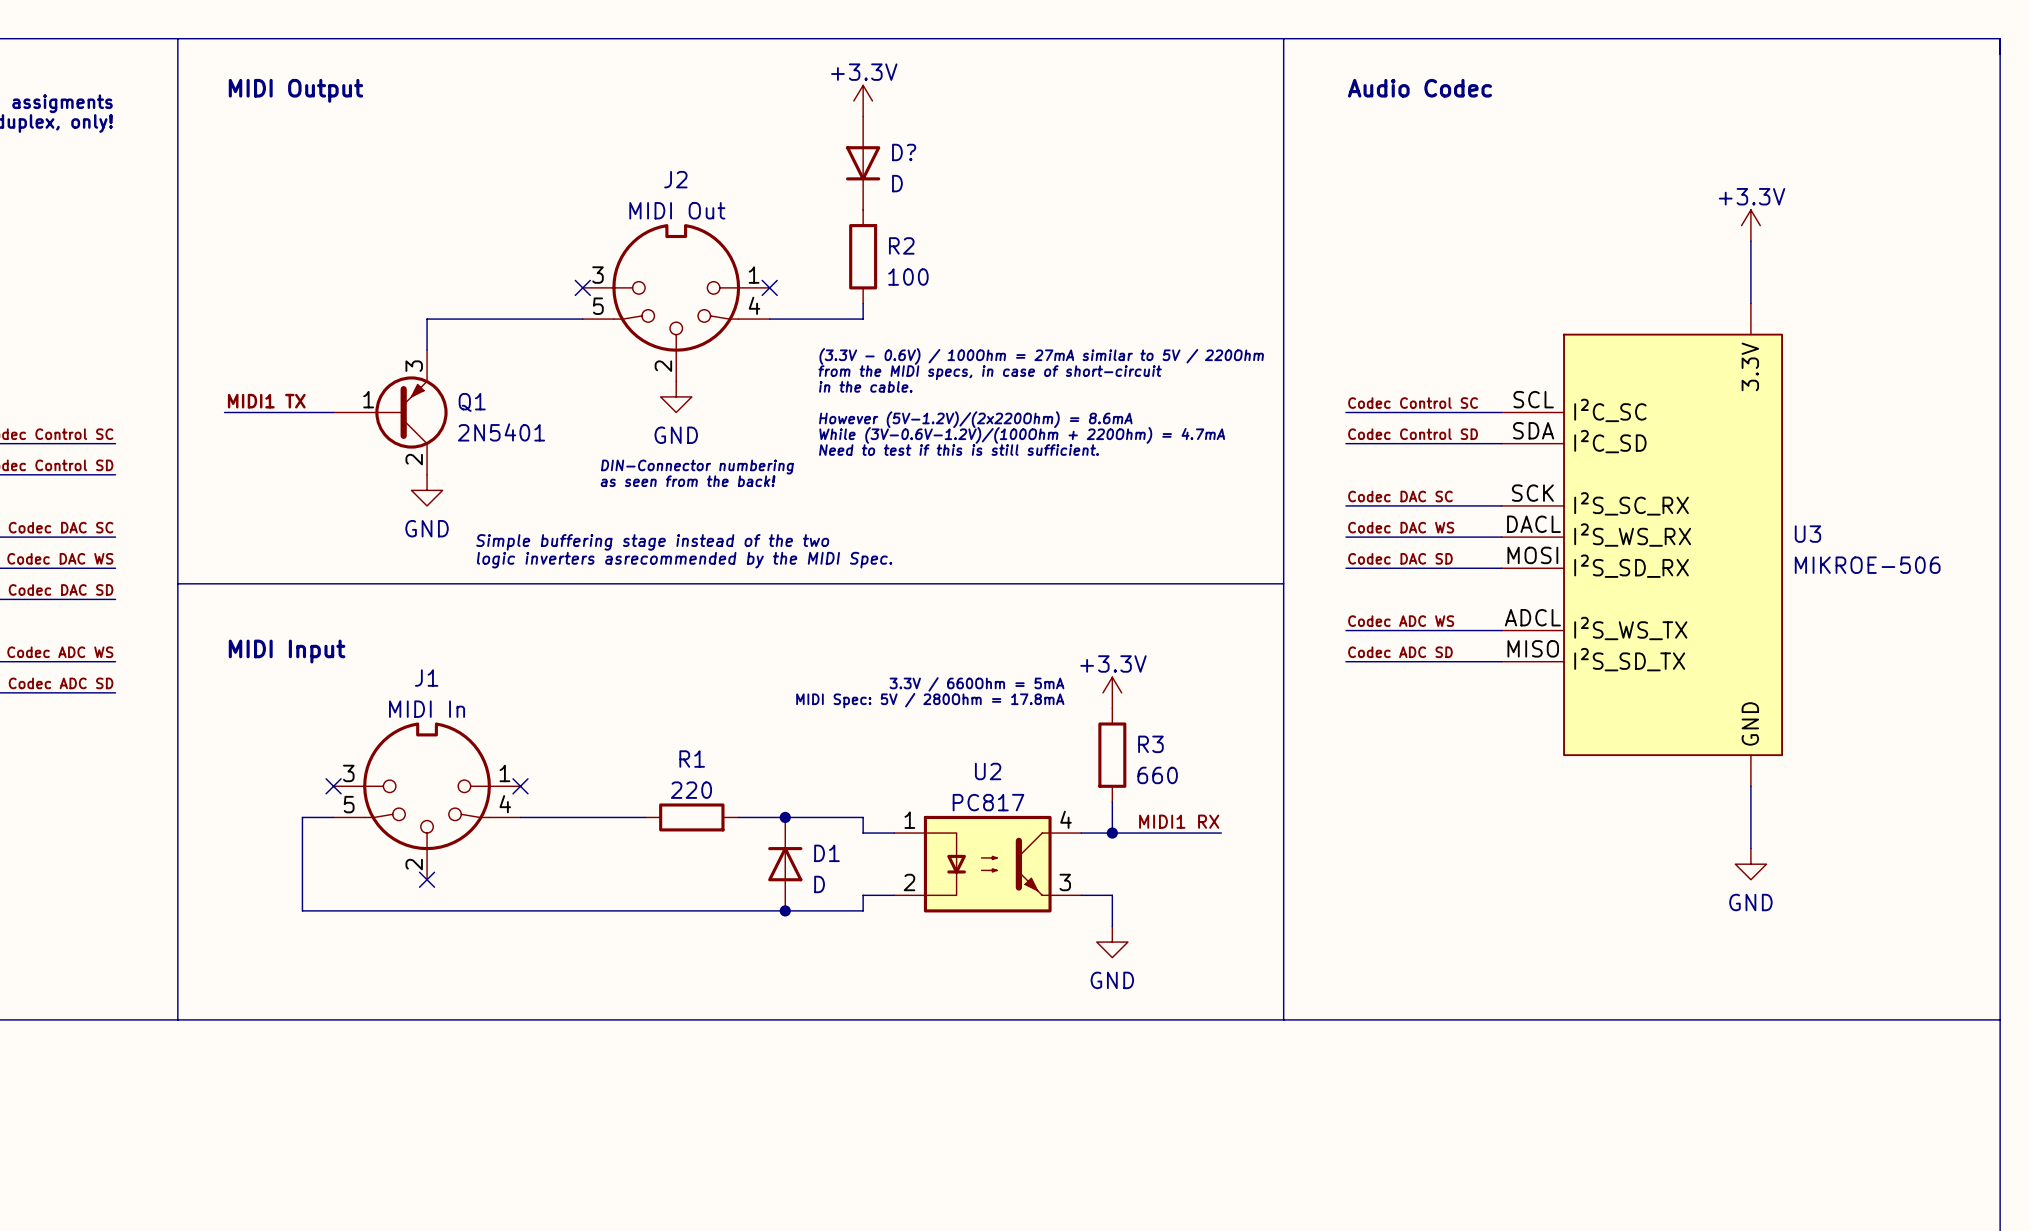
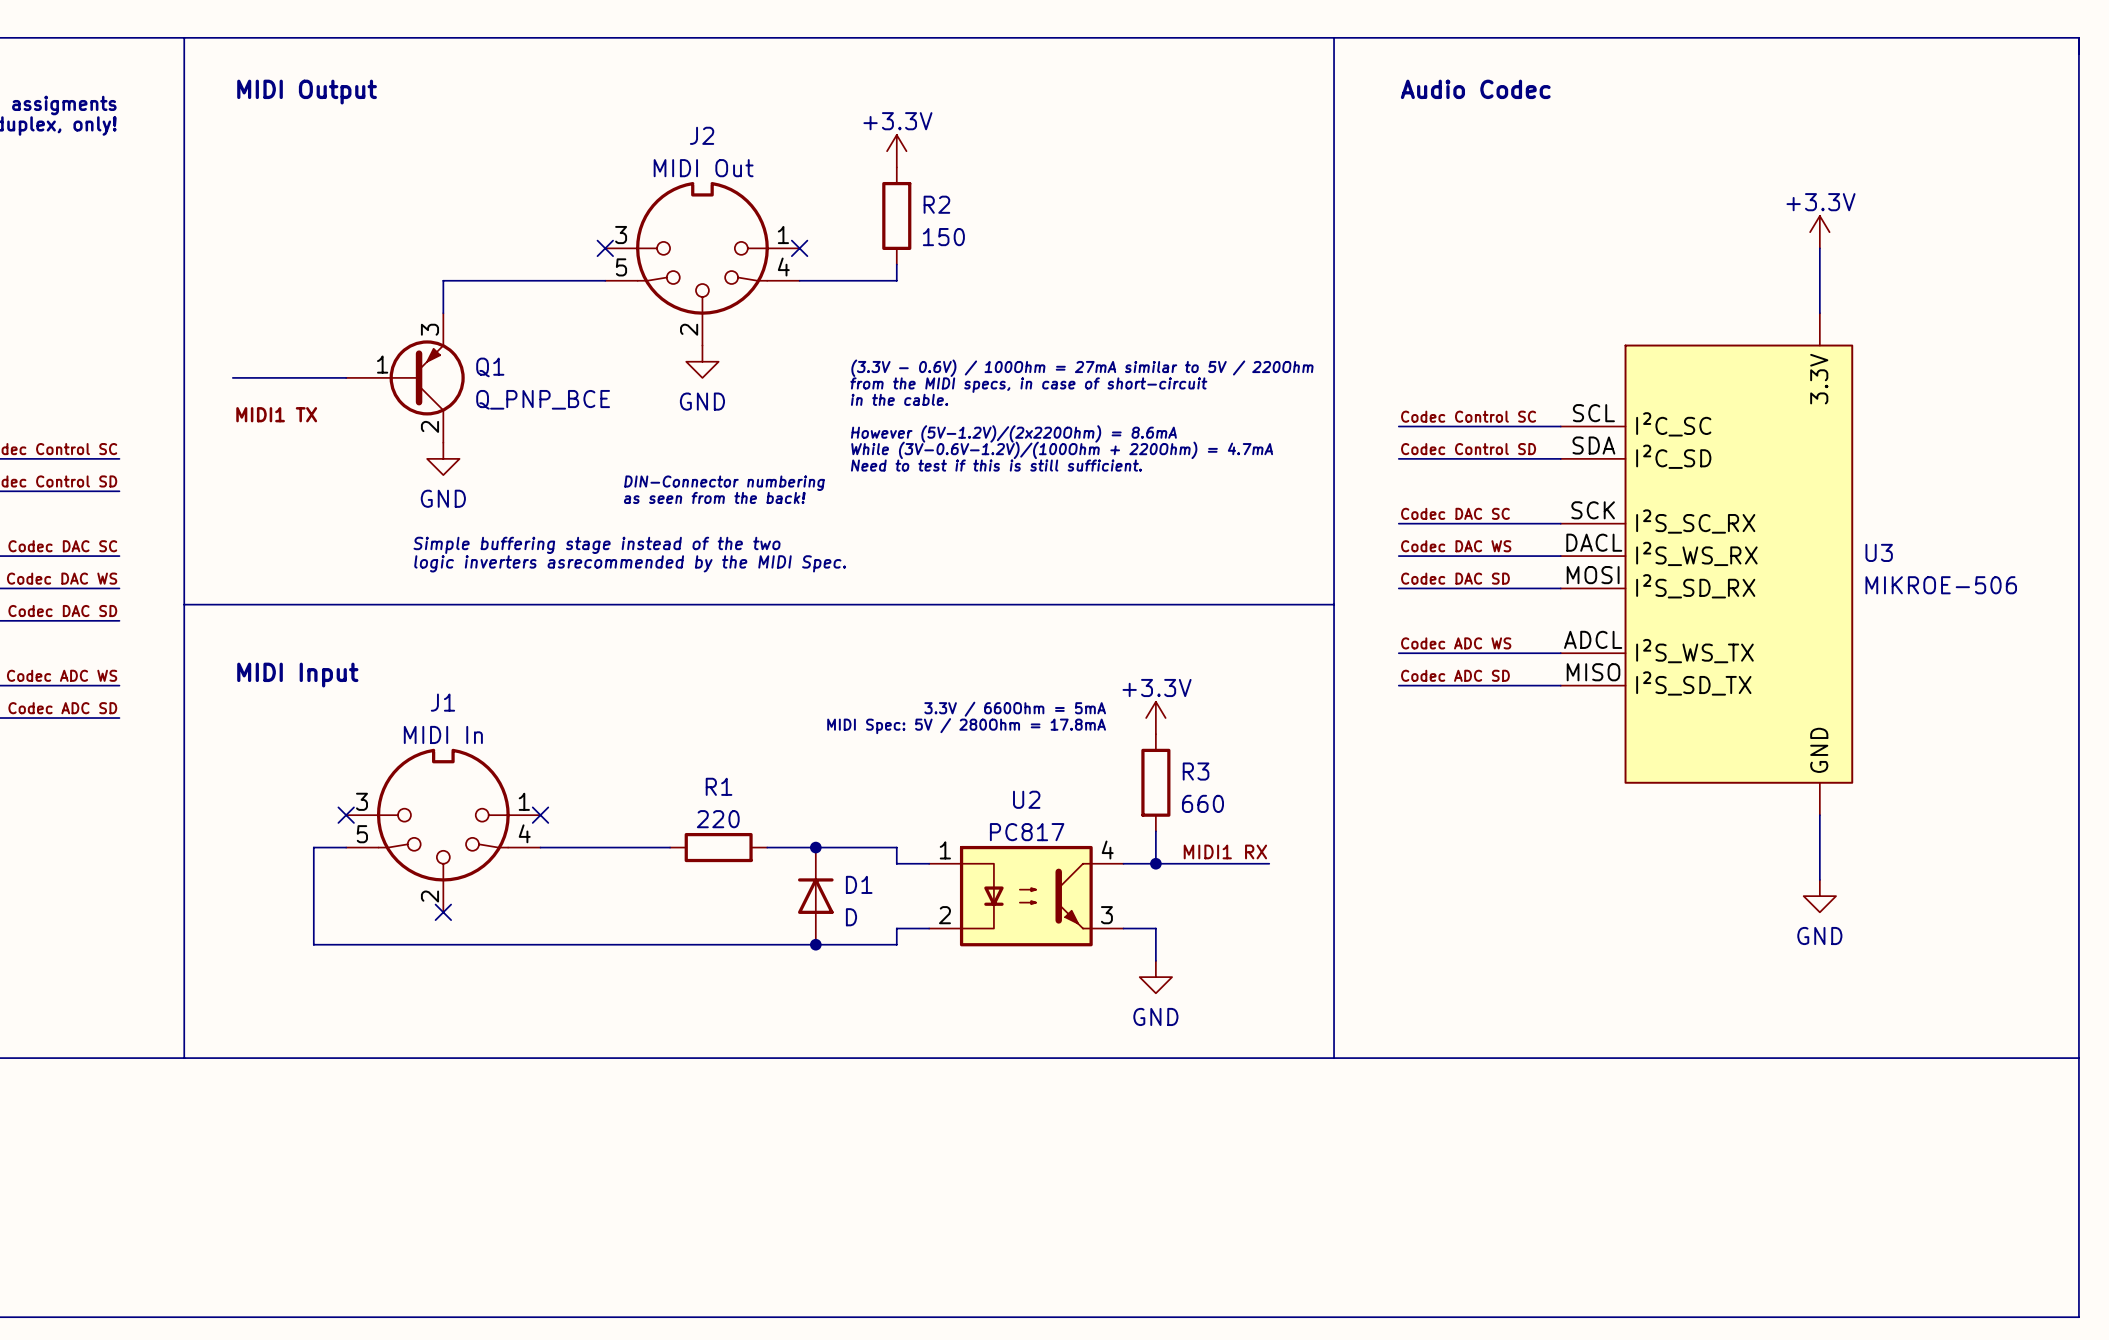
power symbol position: +3.3V (863, 101) -> +3.3V (896, 151)
D?: D (863, 163) -> none
R2 position: (863, 256) -> (896, 215)
R2 value: 100 (908, 277) -> 150 (943, 237)
no-connect mark position: (582, 287) -> (605, 248)
no-connect mark position: (769, 287) -> (799, 248)
J2 position: (676, 302) -> (702, 263)
wire: (863, 303) (863, 319) (769, 319) -> (896, 264) (896, 280) (799, 280)
wire: (582, 319) (427, 319) (427, 350) -> (605, 280) (443, 280) (443, 313)
power symbol position: GND (676, 396) -> GND (702, 361)
wire: (224, 412) (333, 412) -> (232, 377) (346, 377)
Q1 position: (390, 412) -> (405, 377)
Q1 value: 2N5401 (501, 432) -> Q_PNP_BCE (543, 399)
power symbol position: GND (427, 490) -> GND (443, 458)
text position: Simple buffering stage instead of the two (652, 542) -> Simple buffering stage instead of the two (597, 545)
text position: logic inverters asrecommended by the MIDI Spec. (684, 560) -> logic inverters asrecommended by the MIDI Spec. (630, 563)

